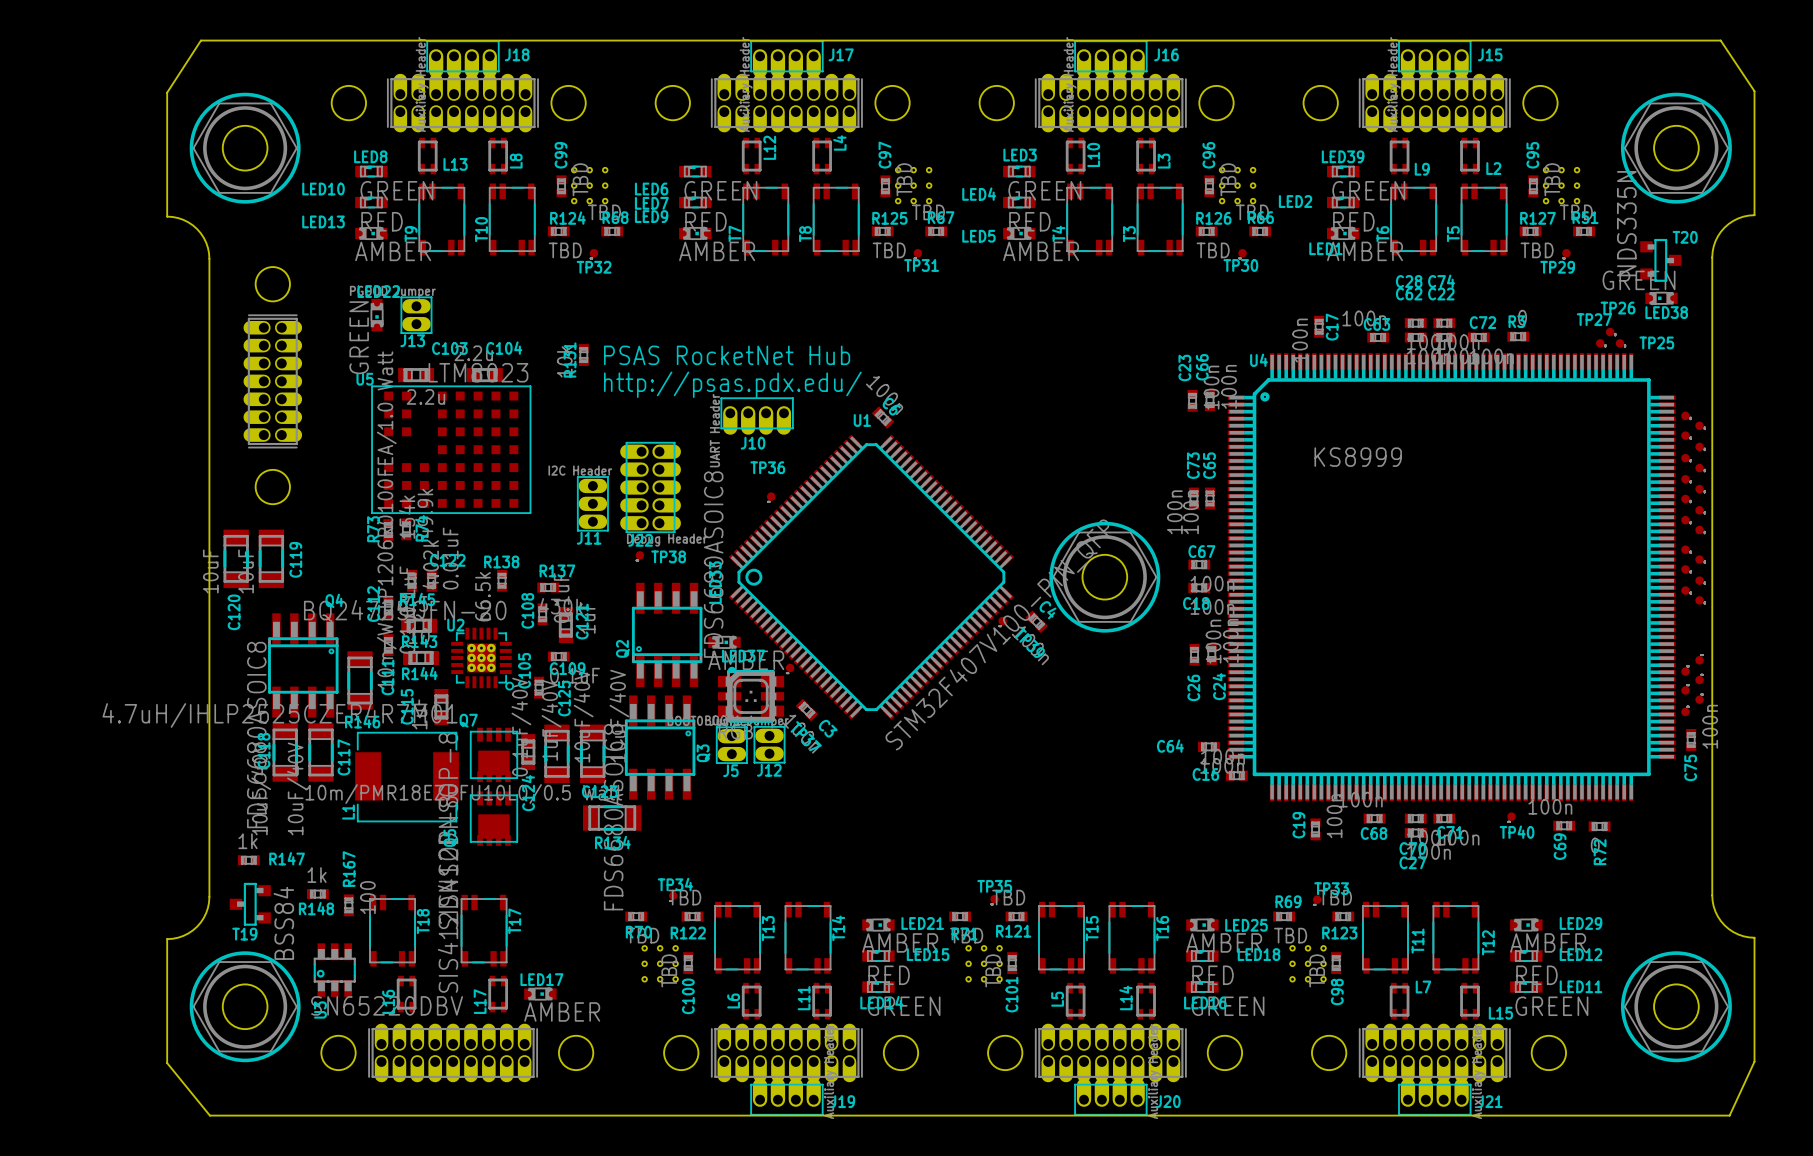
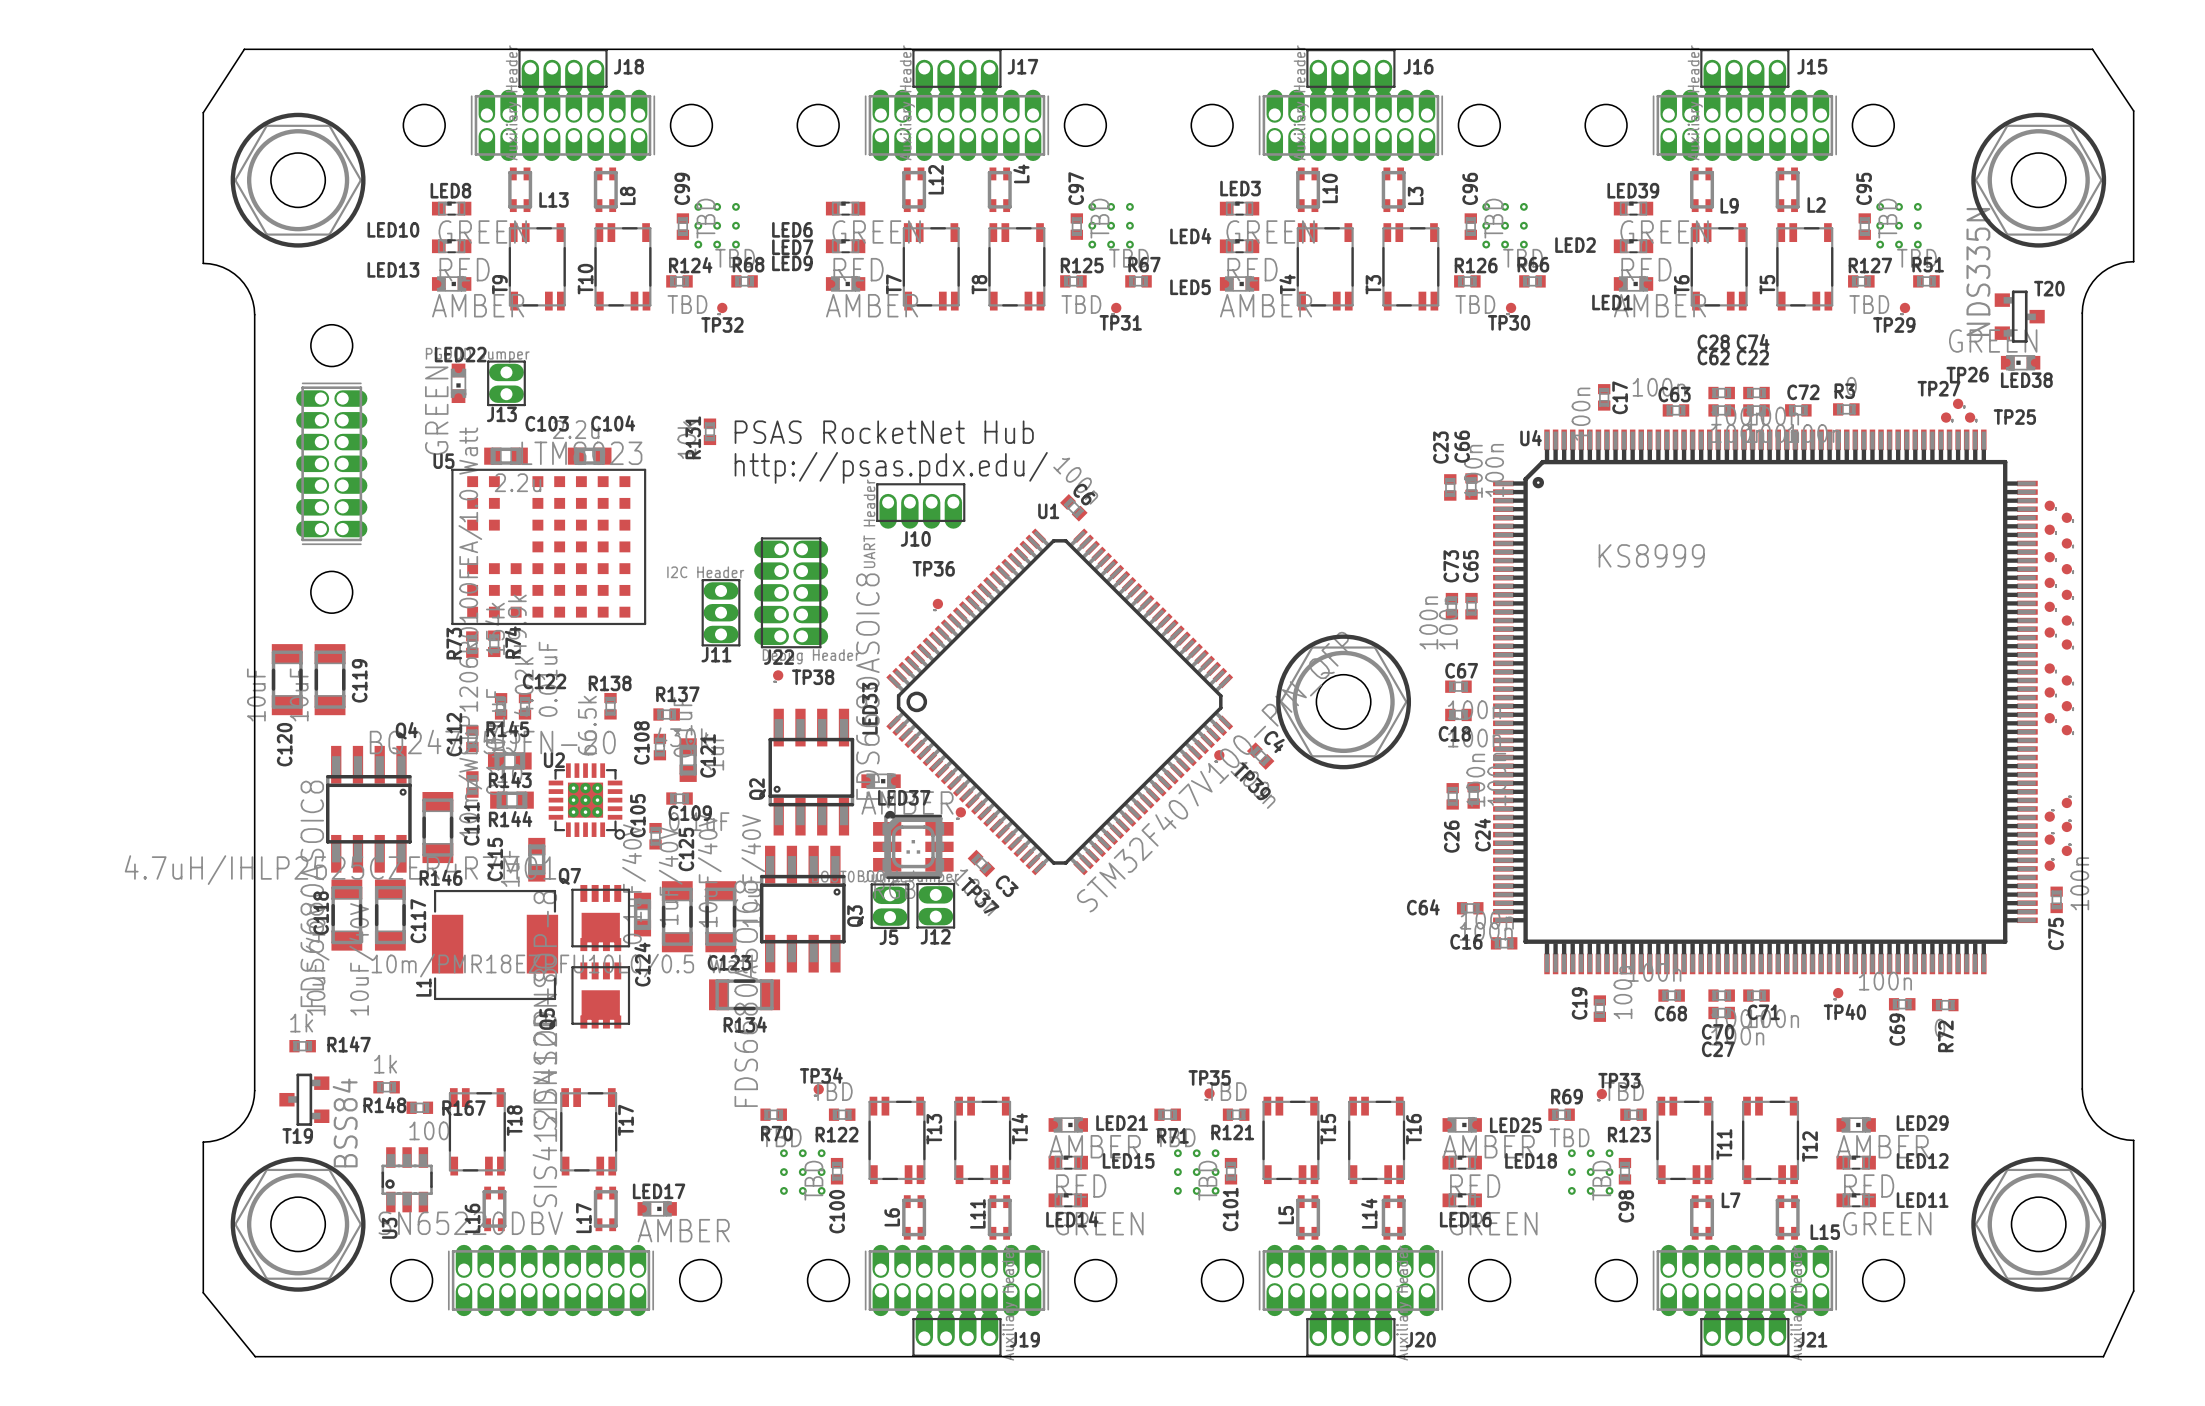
R167 rotation: 0° (348, 905) -> 90° clockwise (419, 1107)

